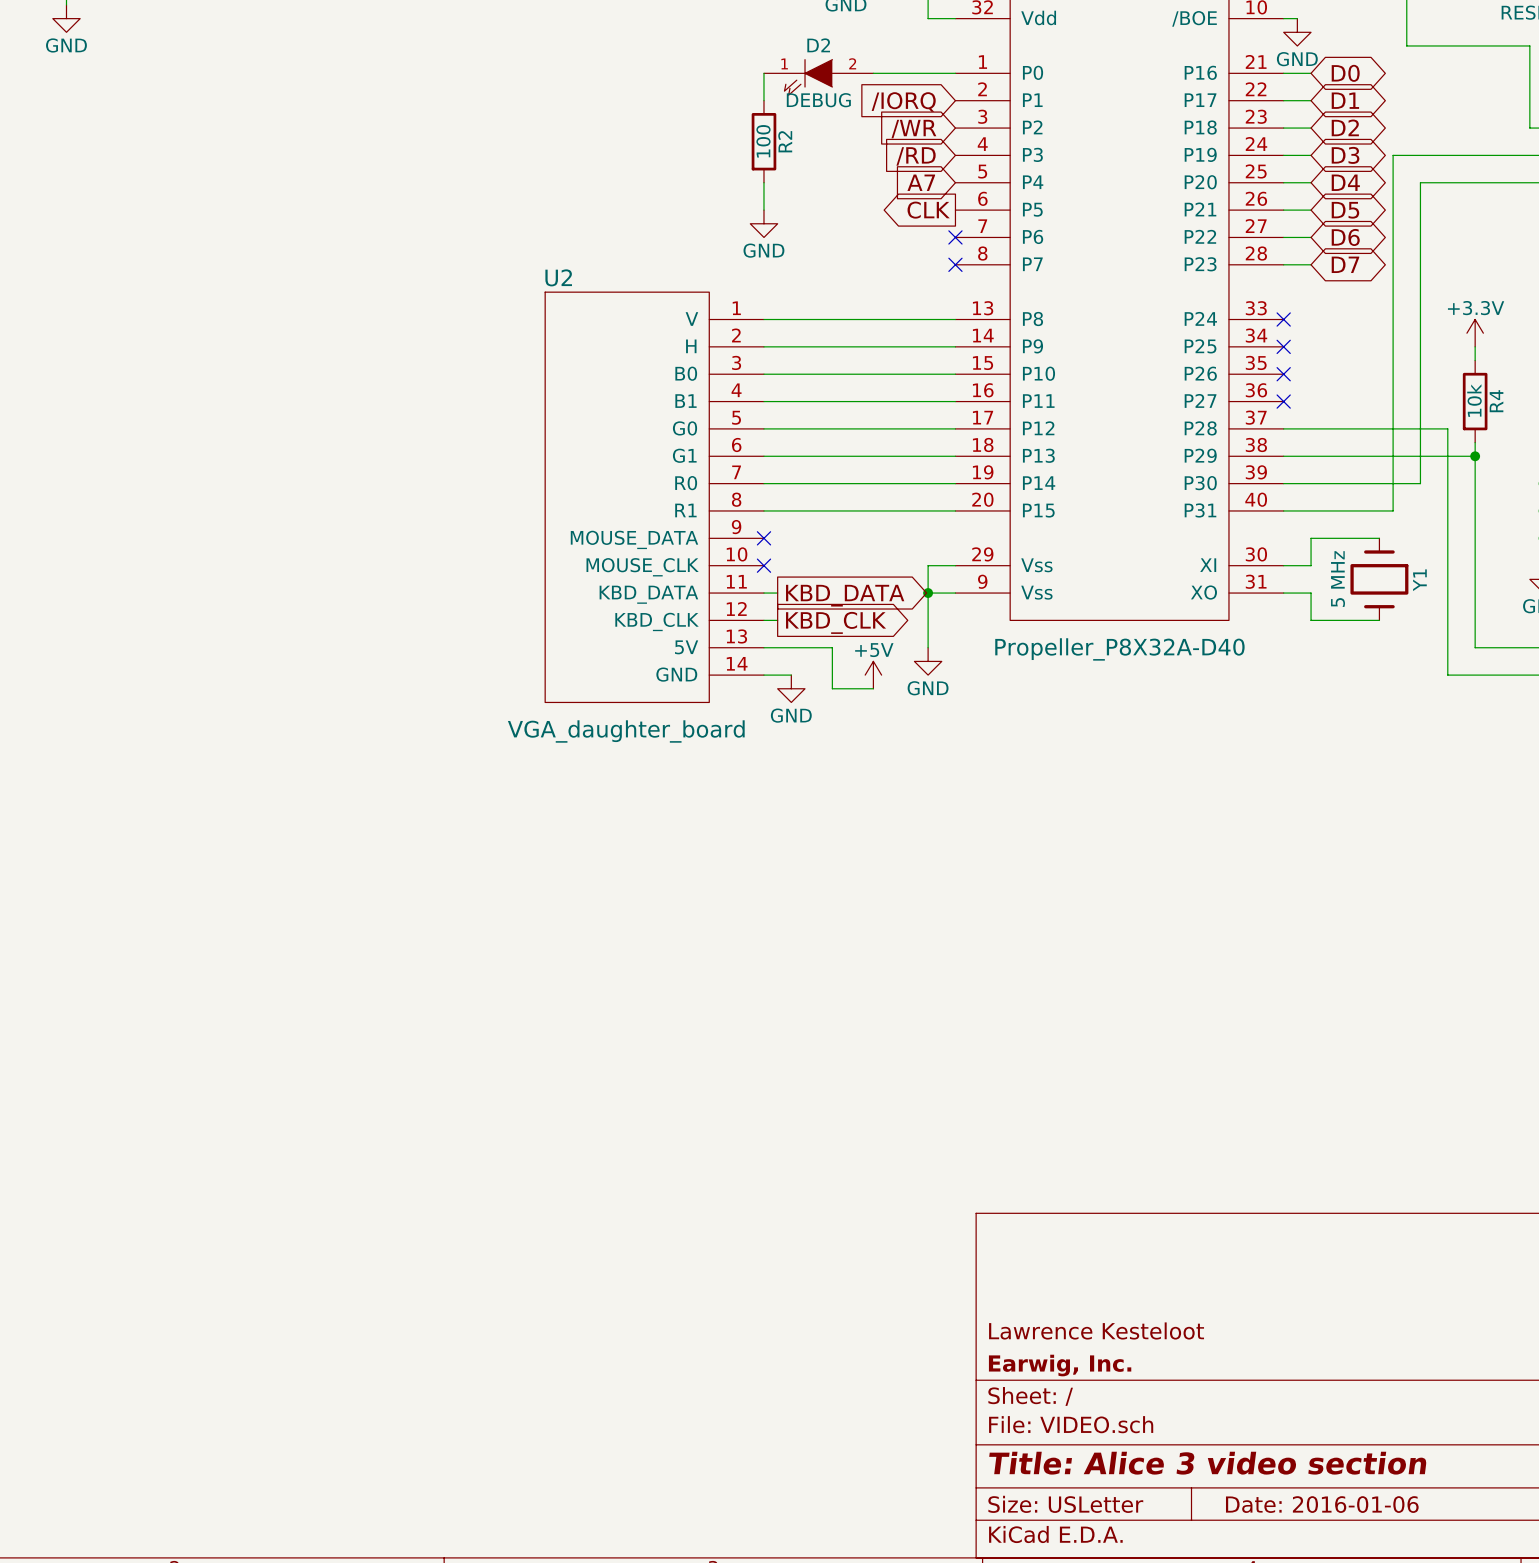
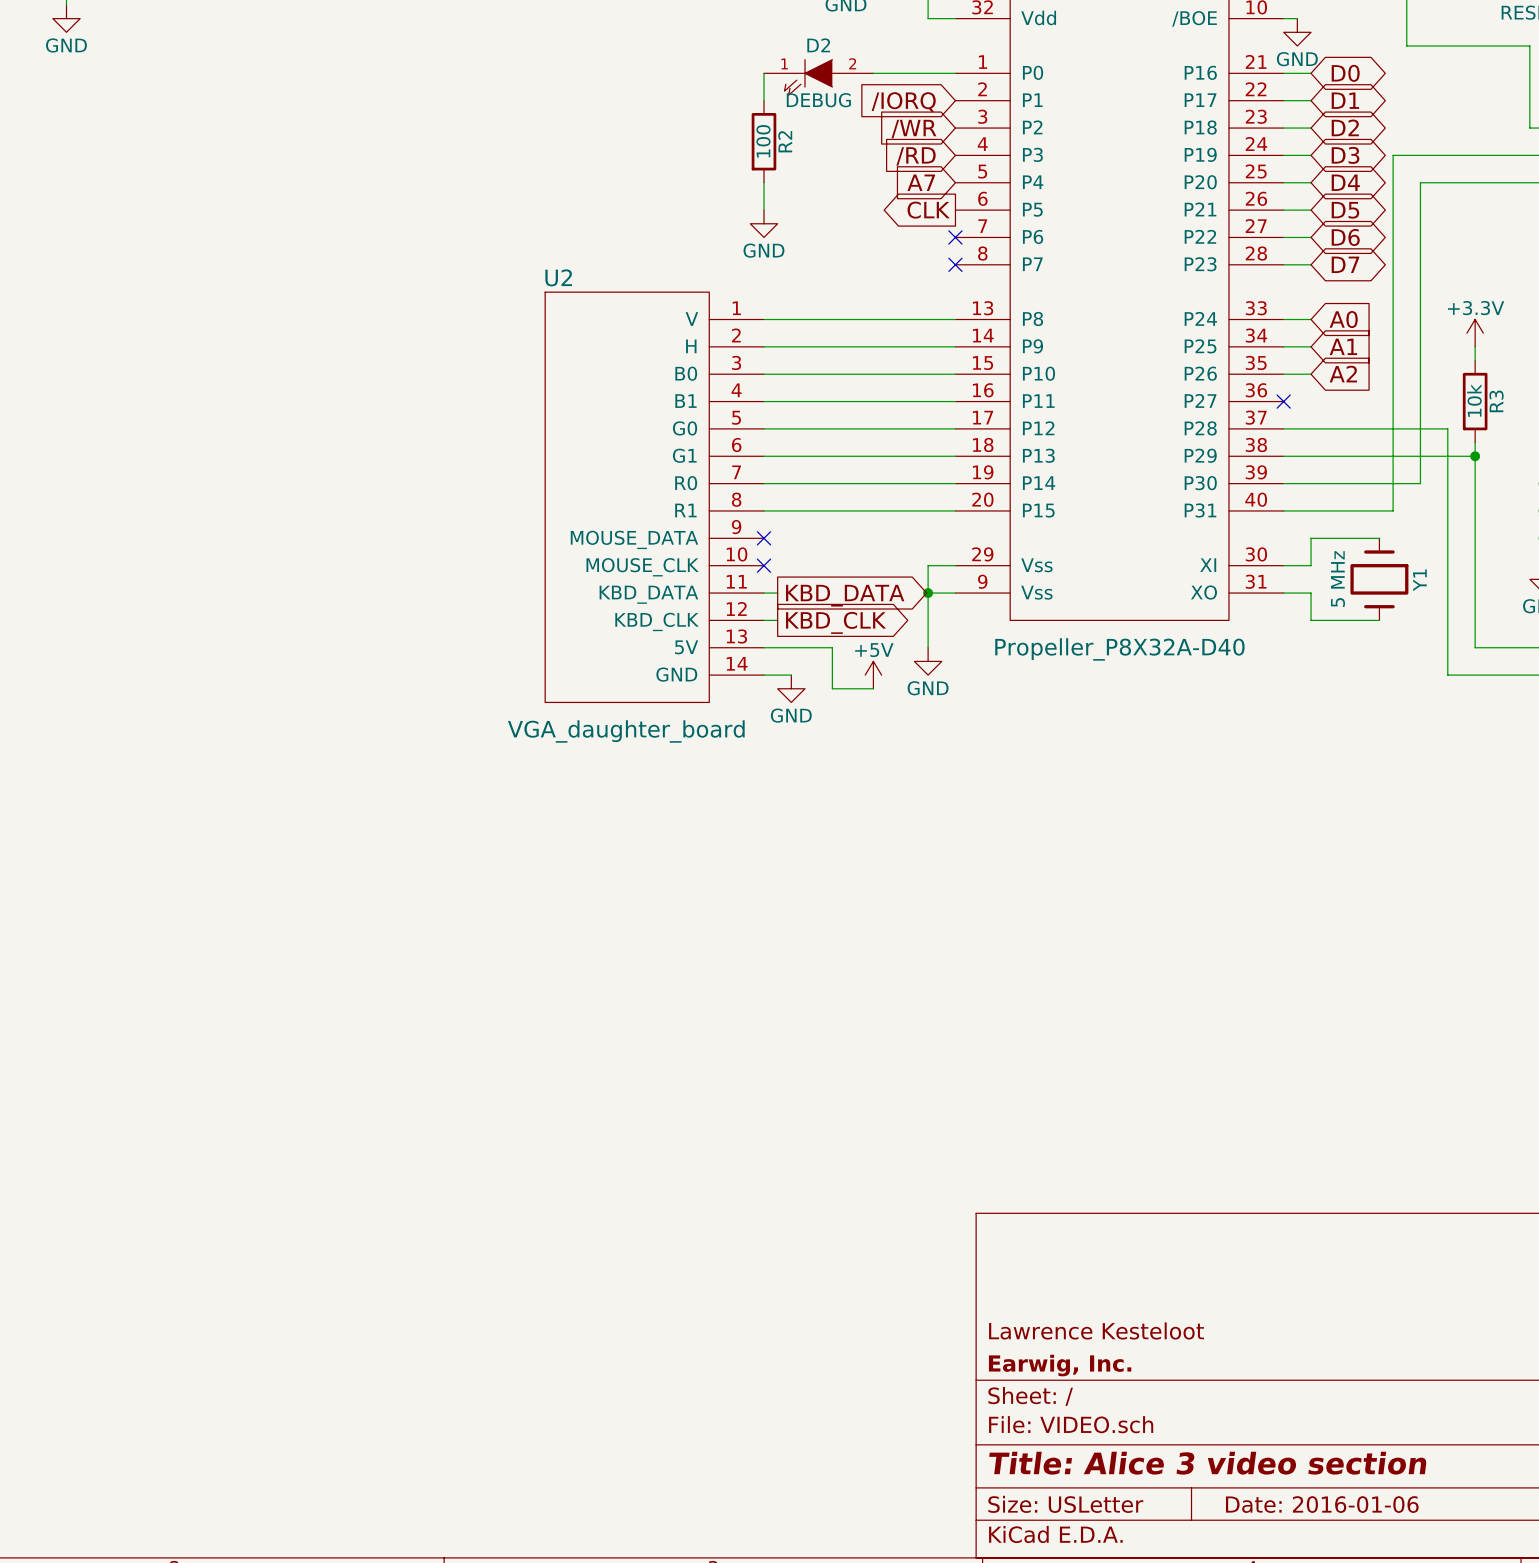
wire: none -> (1283, 319) (1311, 319)
no-connect mark: (1283, 319) -> none
global label: none -> A0 (1343, 319)
wire: none -> (1283, 346) (1311, 346)
no-connect mark: (1283, 346) -> none
global label: none -> A1 (1343, 346)
wire: none -> (1283, 374) (1311, 374)
no-connect mark: (1283, 374) -> none
global label: none -> A2 (1343, 374)
R4 name: R4 (1496, 401) -> R3 (1496, 401)

